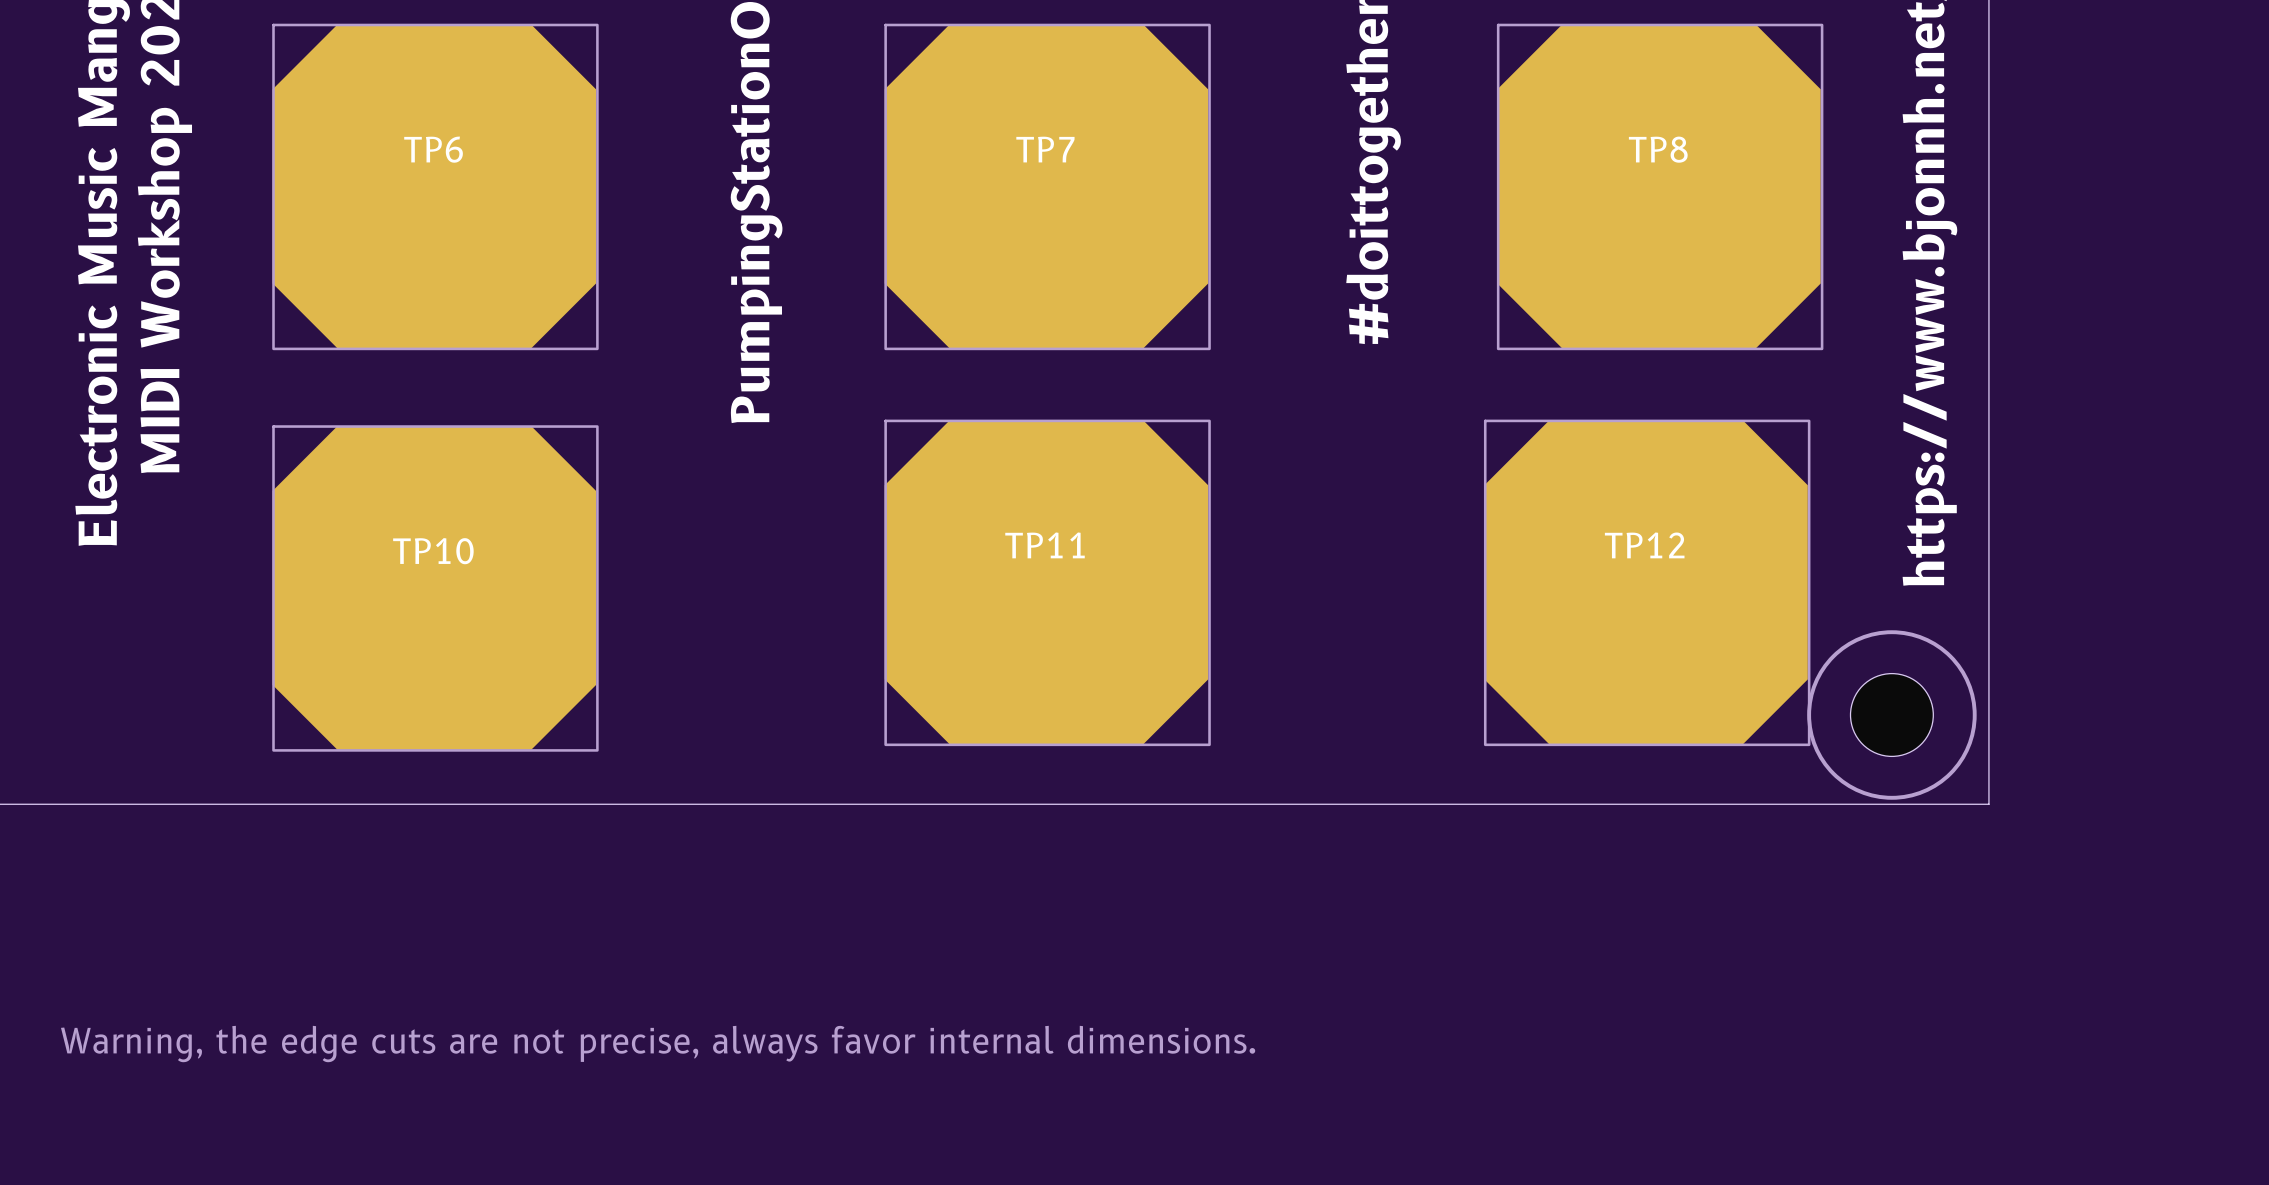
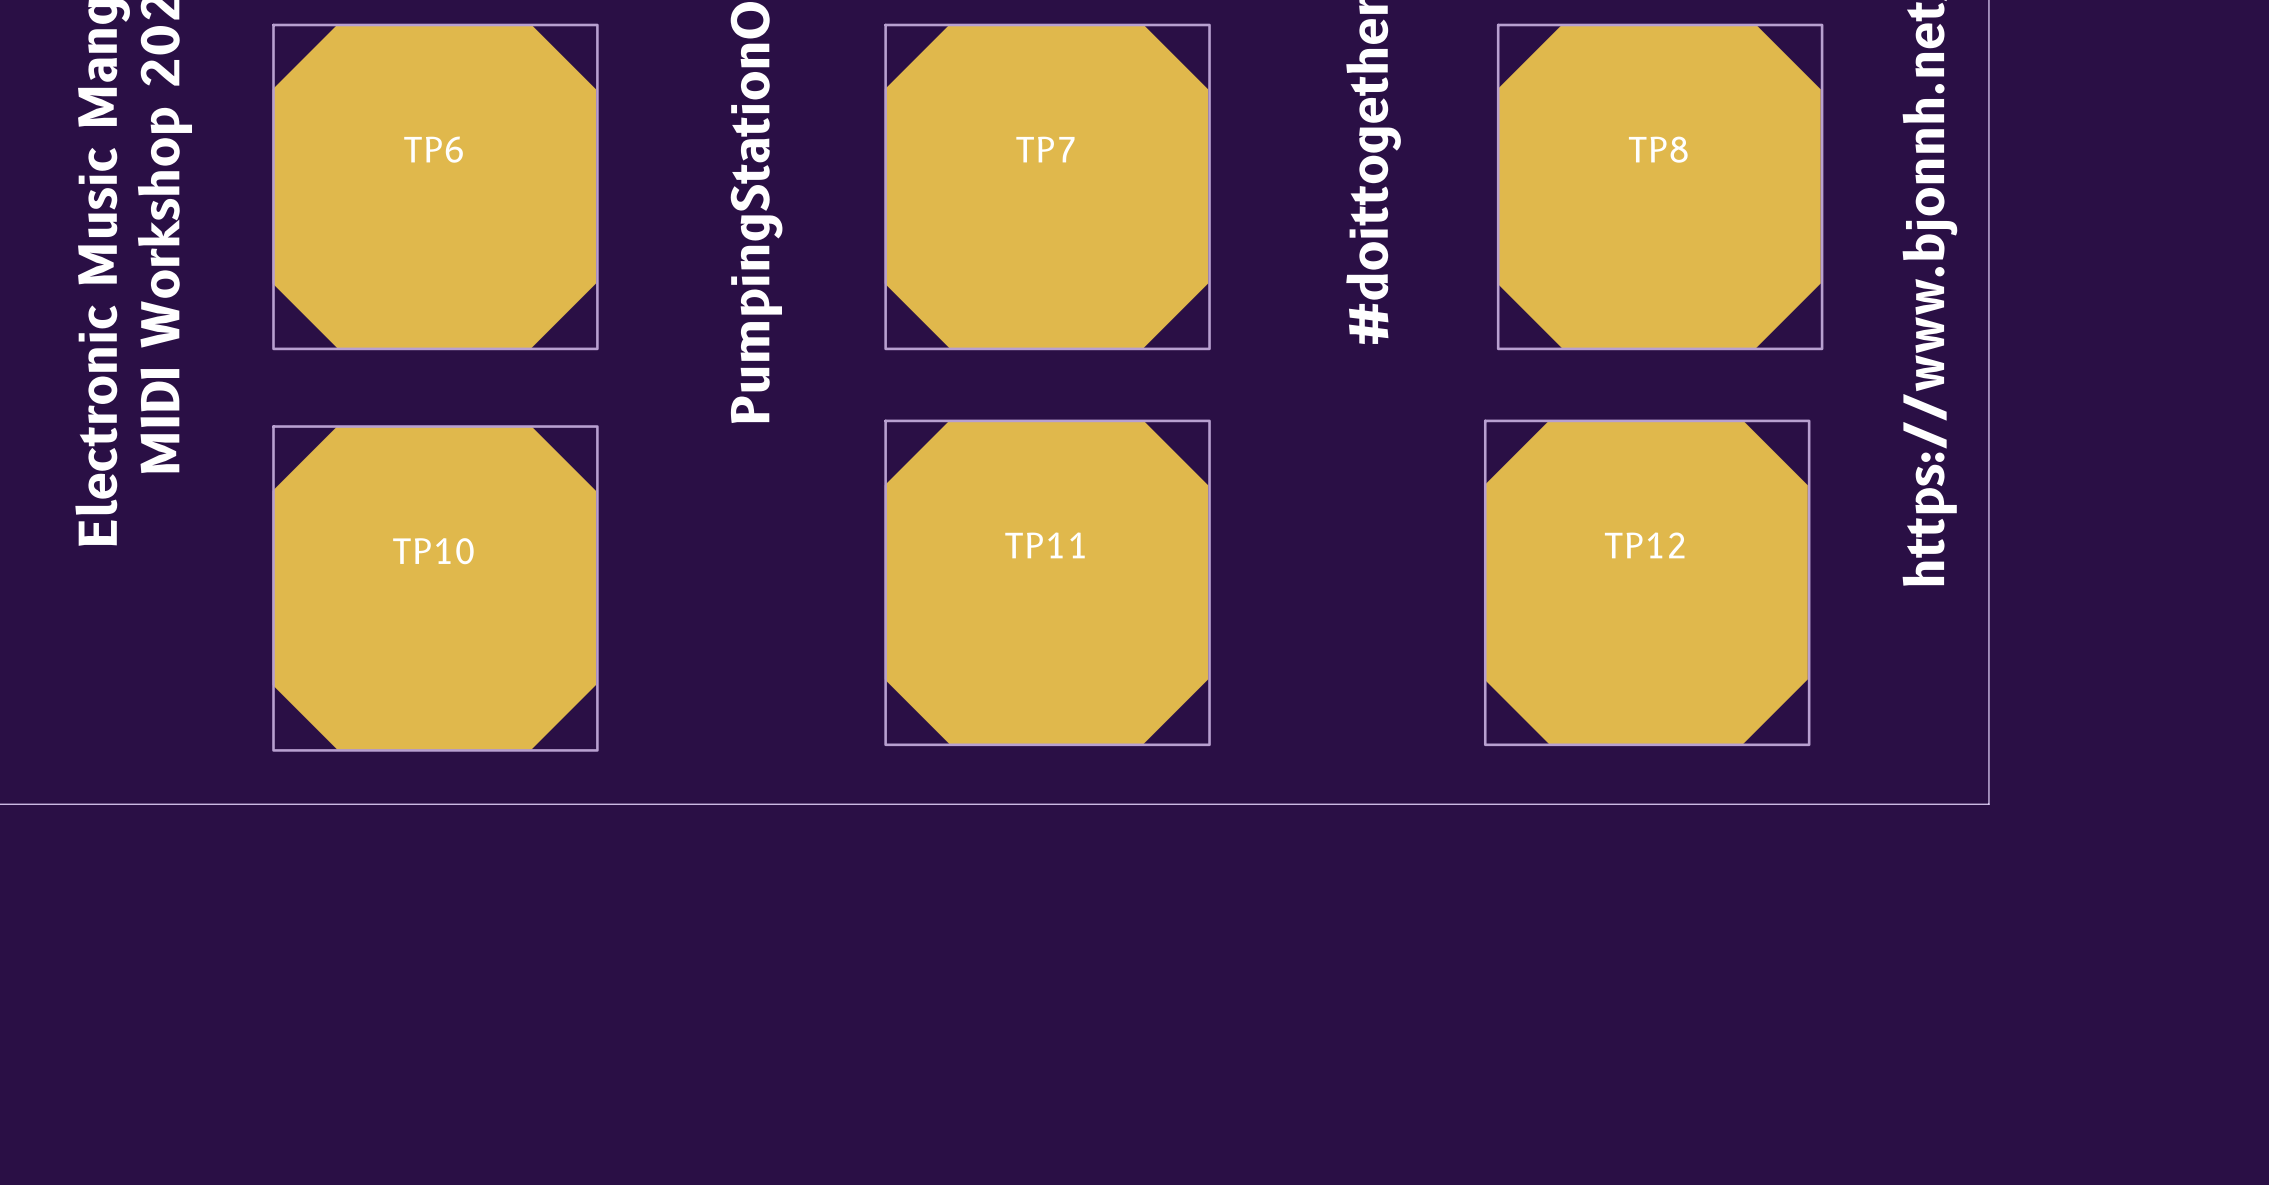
part: (1891, 715) -> none
text: Warning, the edge cuts are not precise, always favor internal dimensions. (658, 1044) -> none

